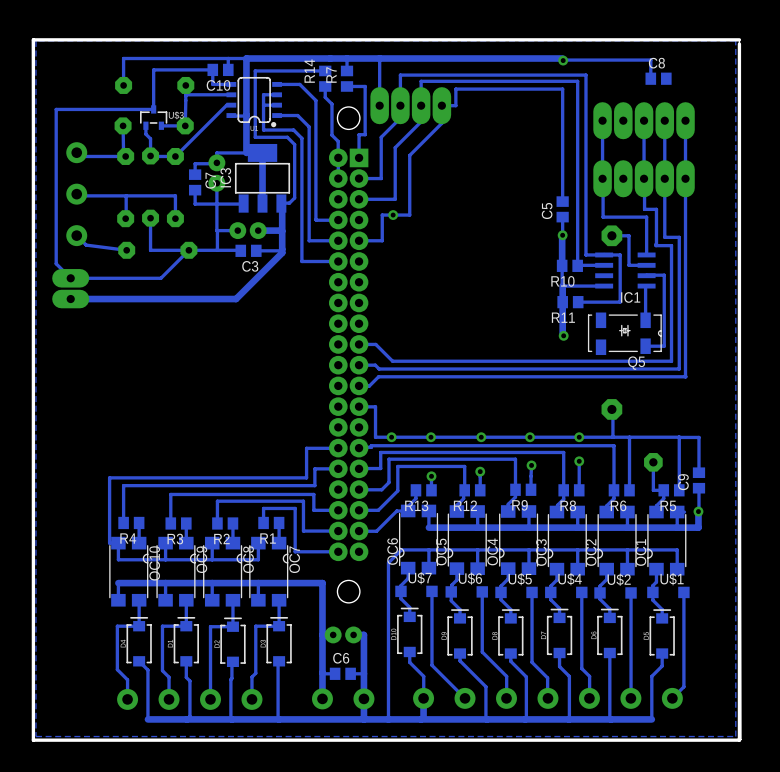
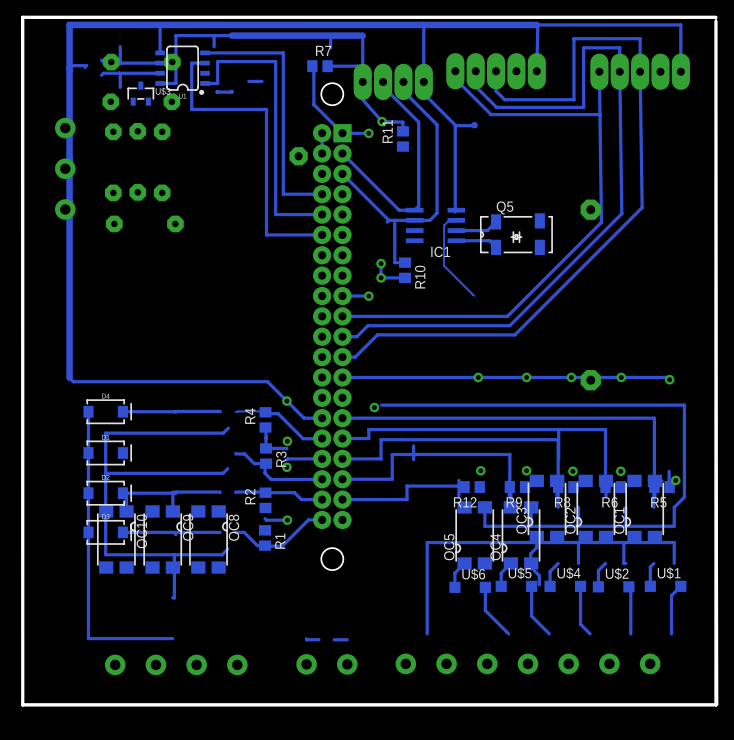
zone outline: (735, 40) (35, 40) (35, 736) (735, 736) (735, 40) -> none
track: none -> (160, 24) (160, 52)
track: none -> (536, 24) (536, 71)
track: none -> (536, 24) (680, 24) (680, 71)
track: (189, 58) (123, 58) (123, 85) -> (175, 35) (175, 83) (160, 83)
track: (246, 58) (246, 152) -> none
track: (379, 58) (650, 60) (650, 78) -> none
via: (563, 60) -> none
track: none -> (120, 46) (120, 63)
C10: (220, 69) -> none
track: (325, 70) (255, 70) (255, 137) (287, 137) (294, 144) (294, 197) (289, 203) (281, 203) (282, 252) (236, 299) (70, 299) -> none
R14: (325, 78) -> none
R7 rotation: 0° (347, 78) -> 90° clockwise (319, 66)
C8: (658, 78) -> none
track: none -> (101, 60) (104, 63) (160, 63)
track: (231, 84) (212, 84) (212, 69) (153, 69) (153, 109) (56, 109) (56, 263) (70, 278) (160, 278) (188, 250) -> none
track: (277, 84) (299, 84) (315, 100) (315, 219) (338, 220) -> (205, 52) (283, 52) (283, 194) (322, 194)
track: (185, 85) (185, 125) (161, 125) -> none
track: (325, 86) (325, 97) (331, 104) (331, 135) (338, 141) (338, 157) -> none
track: (347, 86) (365, 86) (365, 134) (359, 134) (359, 157) -> none
track: none -> (312, 66) (313, 66) (313, 104) (342, 133) (369, 132)
track: none -> (327, 66) (357, 66) (363, 71) (363, 100) (382, 121) (402, 122) (402, 131)
track: none -> (84, 67) (86, 65) (72, 65) (69, 68)
track: (231, 94) (185, 95) -> none
track: (277, 94) (263, 94) (263, 130) (293, 130) (301, 138) (301, 261) -> (205, 63) (191, 63) (191, 109) (266, 109) (266, 234) (286, 234)
track: (400, 94) (400, 75) (585, 75) (585, 254) (620, 254) (620, 302) (578, 302) -> none
track: (421, 94) (421, 81) (577, 81) (577, 265) -> none
track: none -> (455, 71) (454, 78) (490, 114)
part: none -> (496, 71)
track: none -> (119, 73) (120, 87)
track: none -> (160, 73) (103, 73) (101, 75)
part position: (254, 102) -> (182, 70)
track: (231, 105) (226, 105) (175, 156) (150, 155) -> none
track: (441, 105) (455, 105) (455, 89) (562, 89) (562, 201) -> (423, 81) (423, 24)
track: (400, 110) (400, 118) (381, 137) (381, 178) (359, 178) -> (383, 86) (418, 122) (418, 206) (414, 210)
track: (277, 115) (297, 115) (309, 126) (309, 240) -> (205, 83) (217, 83) (217, 61) (275, 61) (275, 214) (293, 214)
track: (421, 115) (421, 121) (395, 147) (395, 199) (359, 199) -> (403, 91) (437, 124) (437, 213) (429, 220) (389, 220)
track: (441, 117) (441, 123) (409, 155) (409, 215) (382, 215) (382, 240) (359, 240) -> (423, 93) (455, 125)
track: (602, 120) (603, 217) (646, 217) (646, 254) -> none
track: (644, 120) (644, 209) (656, 209) (655, 245) (671, 245) (671, 361) (392, 361) (375, 344) -> (599, 71) (601, 222) (507, 316) (358, 316)
part position: (644, 120) -> (640, 71)
track: (664, 120) (664, 237) (679, 237) (679, 369) (379, 369) (373, 365) -> (475, 71) (475, 86) (496, 107) (583, 107) (583, 47) (619, 47) (621, 213) (509, 325) (367, 325) (356, 336)
track: (685, 120) (685, 376) -> none
track: (123, 125) (123, 154) (125, 156) (80, 156) (76, 152) -> none
track: (145, 125) (145, 134) (150, 138) (150, 155) -> none
track: none -> (599, 114) (490, 114)
via: none -> (382, 121)
track: none -> (474, 125) (474, 125)
track: none -> (455, 125) (455, 212) (457, 209)
track: none -> (473, 125) (455, 125)
via: none -> (368, 133)
part: (216, 173) -> none
track: (195, 174) (195, 163) (216, 163) (216, 152) (262, 152) (262, 203) -> none
IC3: (262, 178) -> none
track: none -> (342, 153) (399, 210) (414, 210)
part: (644, 178) -> none
part: none -> (298, 156)
C7: (195, 182) -> none
track: (216, 183) (216, 230) (237, 230) -> none
track: (195, 190) (195, 204) (243, 203) -> none
track: (76, 194) (78, 195) (175, 195) (175, 218) -> none
track: (126, 195) (125, 218) -> none
track: none -> (342, 173) (389, 220)
C5: (562, 209) -> none
via: (393, 215) -> none
track: (562, 217) (562, 286) (604, 286) -> none
track: (150, 218) (150, 250) (240, 250) -> none
track: (217, 230) (217, 250) -> none
part: (248, 230) -> none
track: (258, 230) (282, 231) -> none
track: (76, 235) (86, 245) (126, 250) -> none
via: (562, 235) -> none
track: (611, 235) (629, 235) (629, 265) (646, 265) -> none
track: none -> (389, 220) (387, 222)
track: none -> (394, 220) (394, 262) (404, 262)
track: none -> (456, 220) (448, 221) (444, 225) (444, 265) (474, 295)
track: none -> (496, 221) (487, 230) (456, 230)
track: (282, 249) (256, 250) -> none
C3: (248, 250) -> none
R10 rotation: 0° (569, 265) -> 90° clockwise (404, 270)
R10 position: (569, 265) -> (404, 270)
track: (604, 265) (577, 265) -> none
track: none -> (456, 240) (489, 240) (496, 247)
IC1 position: (625, 270) -> (435, 225)
track: (646, 275) (664, 275) (664, 346) (645, 346) -> none
R10 name position: R10 (562, 281) -> R10 (420, 277)
track: (562, 286) (563, 335) -> none
track: (646, 286) (645, 320) -> none
part: (70, 288) -> none
track: none -> (381, 263) (381, 277) (404, 277)
via: none -> (381, 263)
R11 rotation: 0° (570, 302) -> 90° clockwise (402, 138)
R11 position: (570, 302) -> (402, 138)
via: none -> (381, 277)
track: none -> (342, 296) (368, 296)
via: none -> (368, 296)
Q5 rotation: 0° (624, 333) -> 180° (516, 234)
Q5 position: (624, 333) -> (516, 234)
via: (563, 335) -> none
track: (686, 376) (378, 376) (369, 386) (359, 385) -> (496, 71) (496, 91) (504, 99) (573, 99) (573, 38) (640, 38) (642, 207) (514, 334) (377, 334) (355, 357) (342, 357)
track: (359, 406) (375, 406) (375, 437) (679, 437) -> (342, 377) (667, 377) (669, 379)
via: none -> (478, 377)
via: none -> (526, 377)
via: none -> (571, 377)
via: none -> (621, 377)
via: none -> (669, 379)
track: (611, 409) (612, 437) -> none
via: none -> (286, 401)
track: none -> (381, 405) (684, 405) (684, 497) (674, 507) (674, 526) (484, 526) (484, 507)
track: (679, 436) (679, 490) -> none
via: (430, 437) -> none
via: (481, 437) -> none
via: (530, 437) -> none
via: (579, 437) -> none
track: (629, 437) (629, 490) -> none
track: (679, 437) (698, 437) (698, 472) -> none
track: none -> (88, 411) (88, 638) (172, 638)
track: none -> (122, 411) (220, 412)
track: (338, 448) (306, 448) (306, 477) (109, 477) (109, 543) (118, 543) (118, 559) (258, 559) (258, 543) -> (322, 418) (304, 418) (267, 381) (73, 381) (69, 377) (69, 24) (536, 24)
track: (359, 448) (371, 447) (371, 445) (613, 445) (613, 498) (606, 505) (606, 512) -> (342, 418) (654, 418) (653, 507)
track: none -> (265, 427) (266, 448) (286, 448)
track: none -> (228, 428) (223, 433) (105, 433) (105, 554) (222, 554) (227, 549)
via: (579, 461) -> none
track: (653, 462) (653, 490) (663, 490) (663, 498) (656, 505) (656, 512) -> none
part: (653, 462) -> none
track: (531, 465) (531, 489) -> none
via: (531, 465) -> none
track: (338, 468) (314, 468) (314, 485) (123, 485) (123, 522) -> (322, 438) (303, 438) (278, 413) (267, 413) (264, 411) (235, 412)
track: (359, 468) (380, 468) (380, 452) (563, 452) (563, 499) (557, 505) (556, 512) -> (342, 438) (368, 438) (368, 429) (605, 429) (605, 487)
via: none -> (287, 441)
track: (480, 471) (480, 490) -> none
via: (480, 471) -> none
via: (431, 476) -> none
C9: (698, 480) -> none
track: (698, 488) (698, 527) (428, 527) (428, 510) -> none
track: none -> (322, 458) (286, 459)
track: (359, 489) (381, 489) (389, 482) (389, 459) (515, 459) (515, 497) (508, 504) (508, 511) -> (342, 458) (381, 458) (381, 439) (558, 439) (558, 507)
R9 position: (523, 489) -> (517, 487)
track: (415, 490) (415, 498) (408, 506) (408, 510) -> none
R13: (423, 490) -> none
track: (464, 490) (464, 466) (397, 466) (397, 490) (378, 510) -> (510, 507) (509, 454) (392, 454) (392, 479) (361, 479)
track: (464, 490) (463, 498) (456, 505) (456, 511) -> none
R12 position: (472, 490) -> (472, 487)
R8 position: (571, 490) -> (565, 487)
R6 position: (621, 490) -> (613, 487)
R5 position: (671, 490) -> (662, 487)
track: (269, 494) (170, 494) (170, 523) -> (254, 463) (244, 454) (235, 452)
track: (281, 494) (313, 494) (313, 510) (338, 510) -> (266, 463) (265, 473) (271, 479) (322, 479)
via: none -> (286, 467)
track: none -> (227, 468) (223, 473) (105, 473)
via: none -> (480, 470)
via: none -> (526, 470)
via: none -> (572, 471)
via: none -> (620, 471)
track: none -> (669, 471) (669, 487)
track: (408, 511) (396, 511) (376, 531) (359, 531) -> (464, 487) (407, 486) (407, 499) (342, 499)
R4 rotation: 0° (131, 522) -> 90° clockwise (265, 419)
R4 position: (131, 522) -> (265, 419)
track: (263, 522) (263, 508) (295, 508) (295, 551) (324, 551) -> (235, 533) (244, 532) (257, 545) (282, 546) (308, 519)
R1 rotation: 0° (271, 522) -> 90° clockwise (265, 537)
R1 position: (271, 522) -> (265, 537)
R3 rotation: 0° (178, 523) -> 90° clockwise (266, 456)
R3 position: (178, 523) -> (266, 456)
track: (217, 523) (217, 501) (303, 501) (303, 531) (317, 531) -> (235, 493) (294, 492) (301, 499)
R2 rotation: 0° (225, 523) -> 90° clockwise (265, 500)
R2 position: (225, 523) -> (265, 500)
track: none -> (122, 493) (220, 493)
R1 name position: R1 (268, 538) -> R1 (280, 541)
track: none -> (531, 507) (531, 526)
track: none -> (625, 507) (625, 526)
R3 name position: R3 (175, 539) -> R3 (281, 459)
OC6: (418, 539) -> none
OC5 position: (467, 540) -> (474, 535)
OC4 position: (518, 540) -> (521, 535)
track: (165, 543) (165, 559) -> none
track: (212, 543) (212, 559) -> none
track: (428, 549) (428, 568) -> none
track: (477, 549) (477, 568) -> none
track: (528, 549) (528, 568) (531, 569) -> none
track: (577, 549) (577, 569) -> (578, 507) (578, 526)
track: (627, 549) (627, 569) (625, 569) -> none
track: none -> (265, 518) (287, 520)
via: none -> (287, 520)
track: none -> (122, 532) (173, 532) (175, 534) (175, 532) (220, 533)
track: (408, 568) (408, 578) (400, 585) (400, 598) (409, 607) (409, 616) -> none
track: (456, 568) (456, 579) (451, 585) (451, 600) (460, 609) (460, 618) -> none
track: (508, 568) (508, 578) (500, 586) (500, 592) -> none
track: (606, 569) (606, 579) (599, 586) (599, 592) -> none
track: (656, 569) (656, 582) (652, 585) (652, 600) (662, 609) (662, 618) -> none
track: (677, 569) (677, 549) (401, 549) (388, 562) (388, 719) -> none
OC7: (268, 571) -> none
track: none -> (578, 542) (578, 563)
track: none -> (623, 542) (623, 563) (625, 563)
track: (165, 583) (165, 600) -> none
track: (212, 583) (212, 600) -> none
track: (258, 583) (258, 600) -> none
track: none -> (174, 554) (174, 597) (172, 597)
U$7: (416, 591) -> none
track: (431, 591) (431, 665) (465, 698) -> none
U$6 position: (466, 591) -> (470, 587)
track: (482, 591) (482, 652) (506, 676) (506, 698) -> none
track: (501, 592) (501, 599) (510, 609) (510, 618) -> none
U$5 position: (516, 592) -> (516, 586)
track: (532, 592) (532, 662) (547, 677) (547, 698) -> none
U$4 position: (566, 592) -> (565, 586)
track: (581, 592) (581, 668) (589, 676) (589, 698) -> none
track: (600, 592) (600, 599) (609, 609) (609, 617) -> none
U$2 position: (615, 592) -> (613, 586)
track: (631, 592) (630, 698) -> none
U$1 position: (668, 592) -> (665, 586)
track: (683, 592) (683, 686) (672, 698) -> none
track: none -> (464, 563) (454, 573) (454, 587)
track: none -> (510, 563) (501, 573) (501, 586)
track: none -> (558, 563) (550, 571) (550, 586)
track: none -> (605, 563) (598, 570) (598, 586)
track: none -> (653, 563) (650, 567) (650, 586)
track: none -> (674, 563) (674, 542) (427, 542) (427, 633)
track: (118, 600) (118, 583) (322, 583) (322, 700) -> none
track: (139, 600) (139, 626) (117, 626) (117, 669) (127, 679) (127, 699) -> none
track: (186, 600) (186, 626) (162, 626) (162, 670) (169, 677) (169, 699) -> none
track: (232, 600) (232, 626) (210, 626) (210, 699) -> none
track: (279, 600) (279, 626) (255, 626) (255, 673) (251, 677) (251, 699) -> none
track: none -> (531, 586) (531, 616) (549, 633)
track: none -> (580, 586) (580, 624) (590, 633)
track: none -> (628, 586) (630, 588) (630, 633)
track: none -> (680, 586) (671, 595) (671, 633)
track: none -> (485, 587) (485, 610) (508, 633)
part: (409, 632) -> none
part: (460, 633) -> none
part: (510, 633) -> none
part: (559, 633) -> none
part: (609, 633) -> none
part: (662, 633) -> none
part: (343, 634) -> none
track: (353, 634) (363, 634) (364, 719) -> none
part rotation: 0° (139, 641) -> 90° clockwise (107, 411)
part position: (139, 641) -> (107, 411)
part rotation: 0° (186, 641) -> 90° clockwise (107, 452)
part position: (186, 641) -> (107, 452)
part rotation: 0° (279, 641) -> 90° clockwise (107, 532)
part position: (279, 641) -> (107, 532)
part rotation: 0° (232, 642) -> 90° clockwise (107, 493)
part position: (232, 642) -> (107, 493)
track: (409, 651) (409, 662) (423, 676) (423, 717) (421, 719) -> none
track: (460, 653) (460, 660) (485, 686) (486, 719) -> none
track: (510, 653) (510, 661) (526, 676) (525, 719) -> none
track: (559, 653) (559, 666) (569, 676) (568, 719) -> none
track: (609, 653) (610, 719) -> none
track: (662, 653) (662, 666) (651, 676) (651, 719) (147, 719) (147, 670) (139, 661) -> none
track: (232, 661) (230, 679) (231, 719) -> none
track: (279, 661) (279, 719) -> none
track: (189, 664) (186, 661) (186, 677) (189, 681) (189, 716) (186, 719) -> none
C6: (342, 673) -> none

